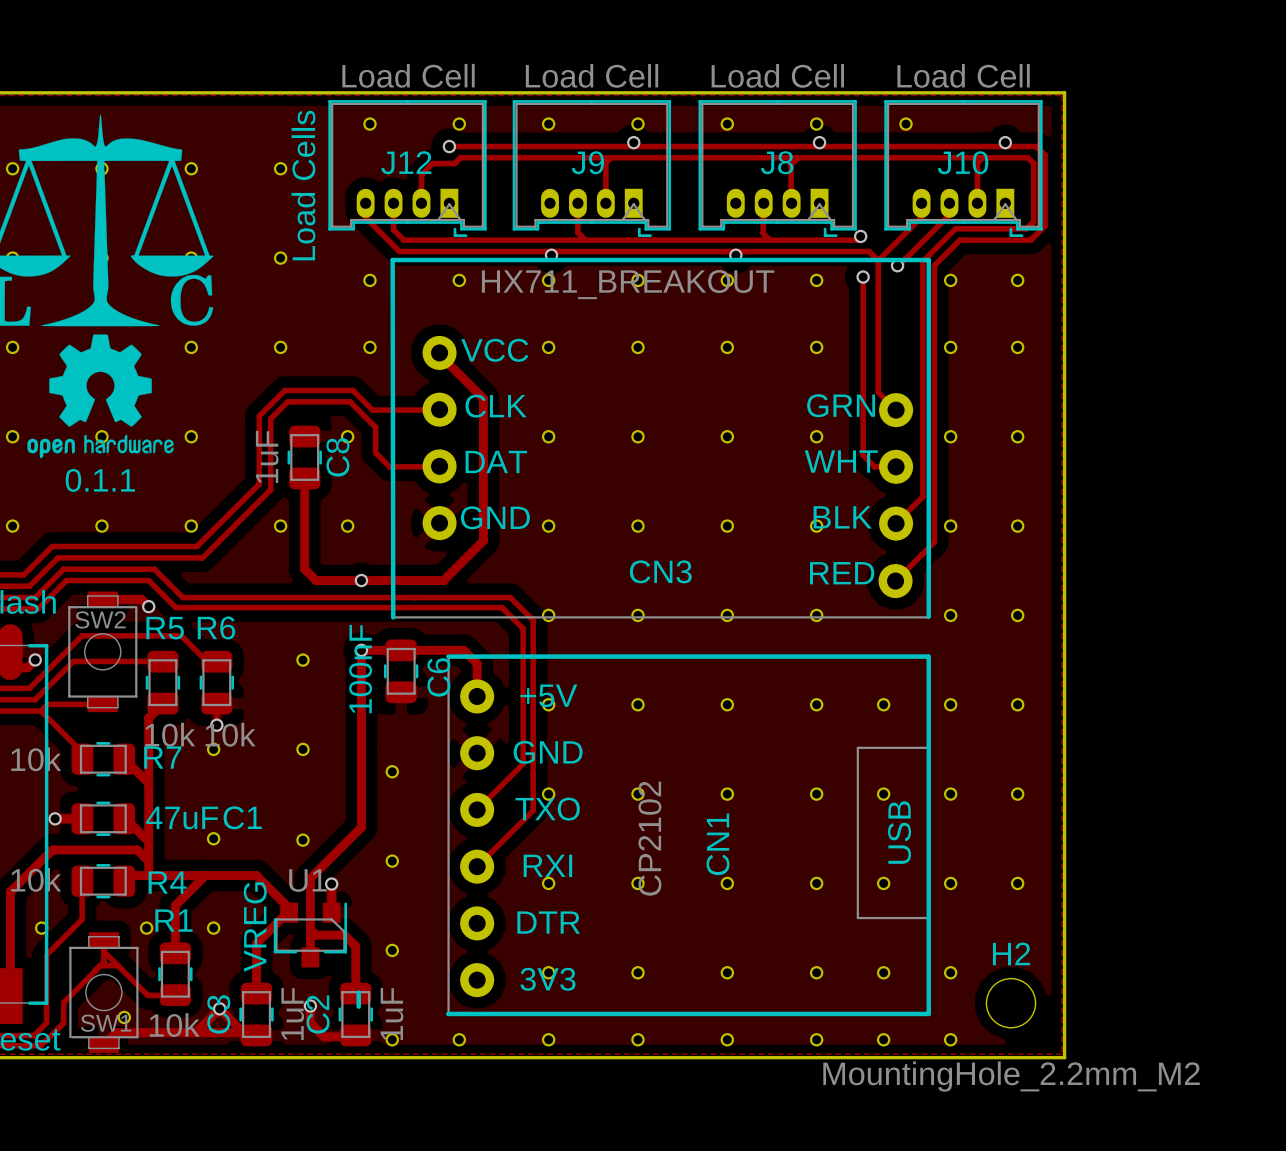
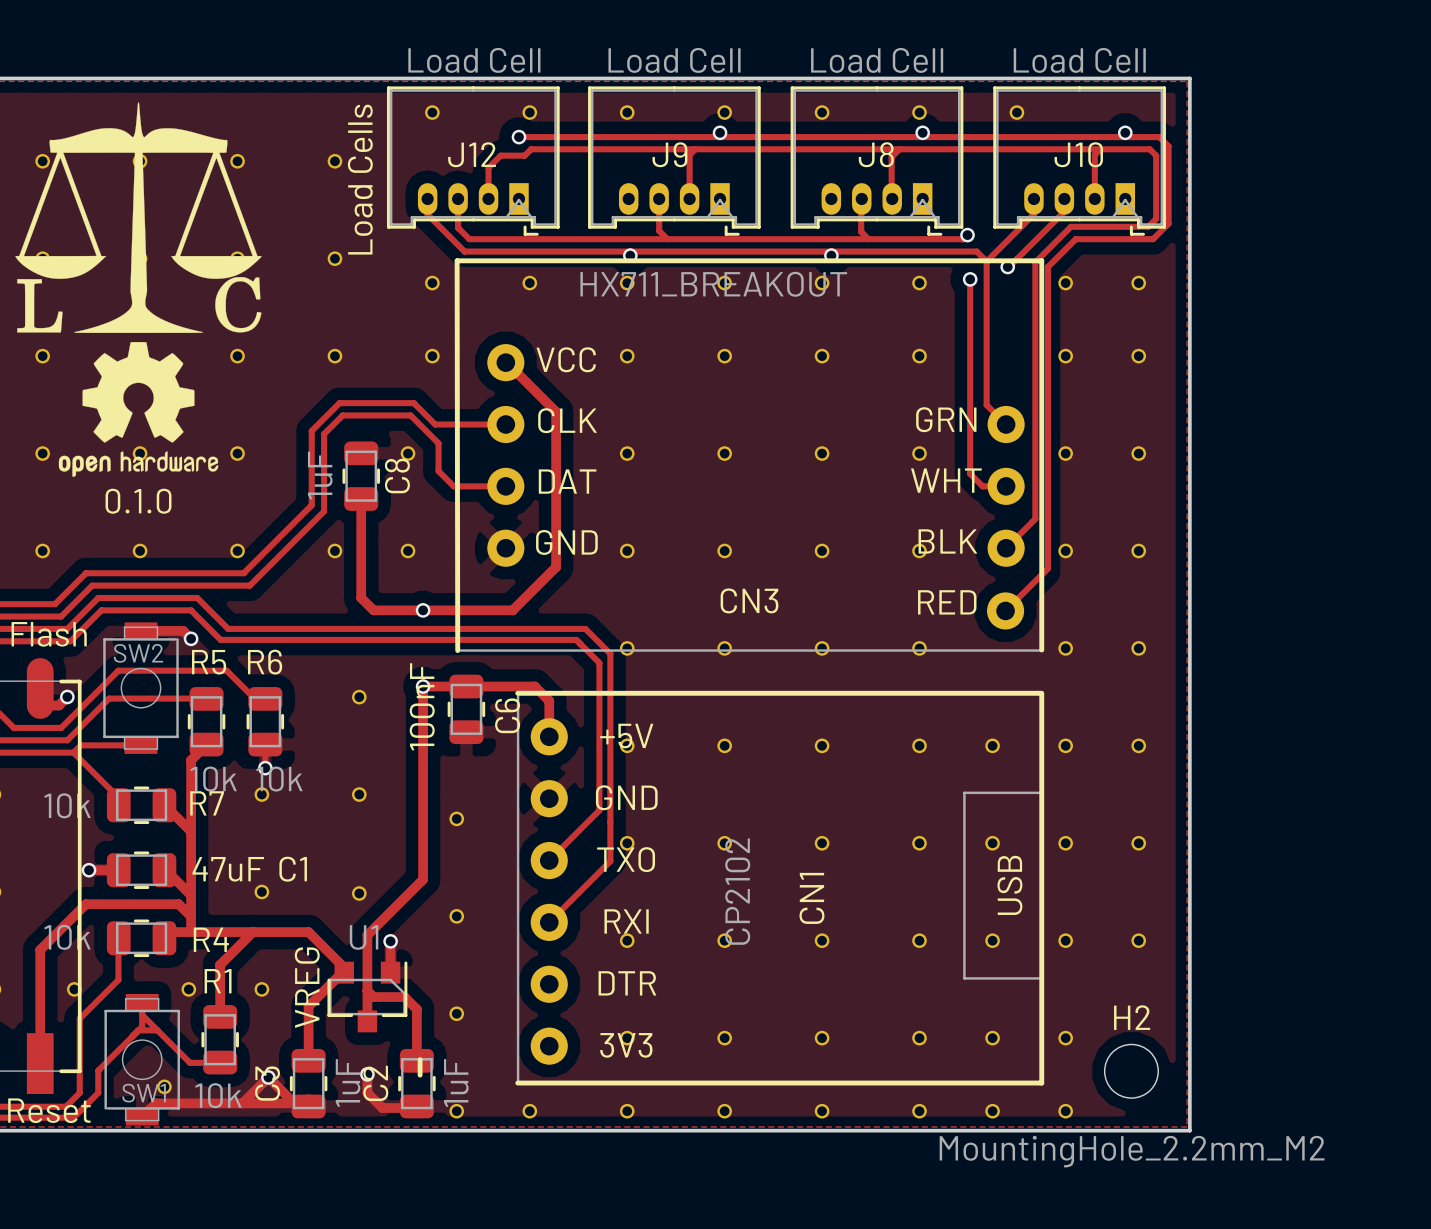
CN3 footprint: [391, 258, 930, 619] -> [455, 259, 1043, 652]
text: 0.1.1 (100, 480) -> 0.1.0 (138, 501)

